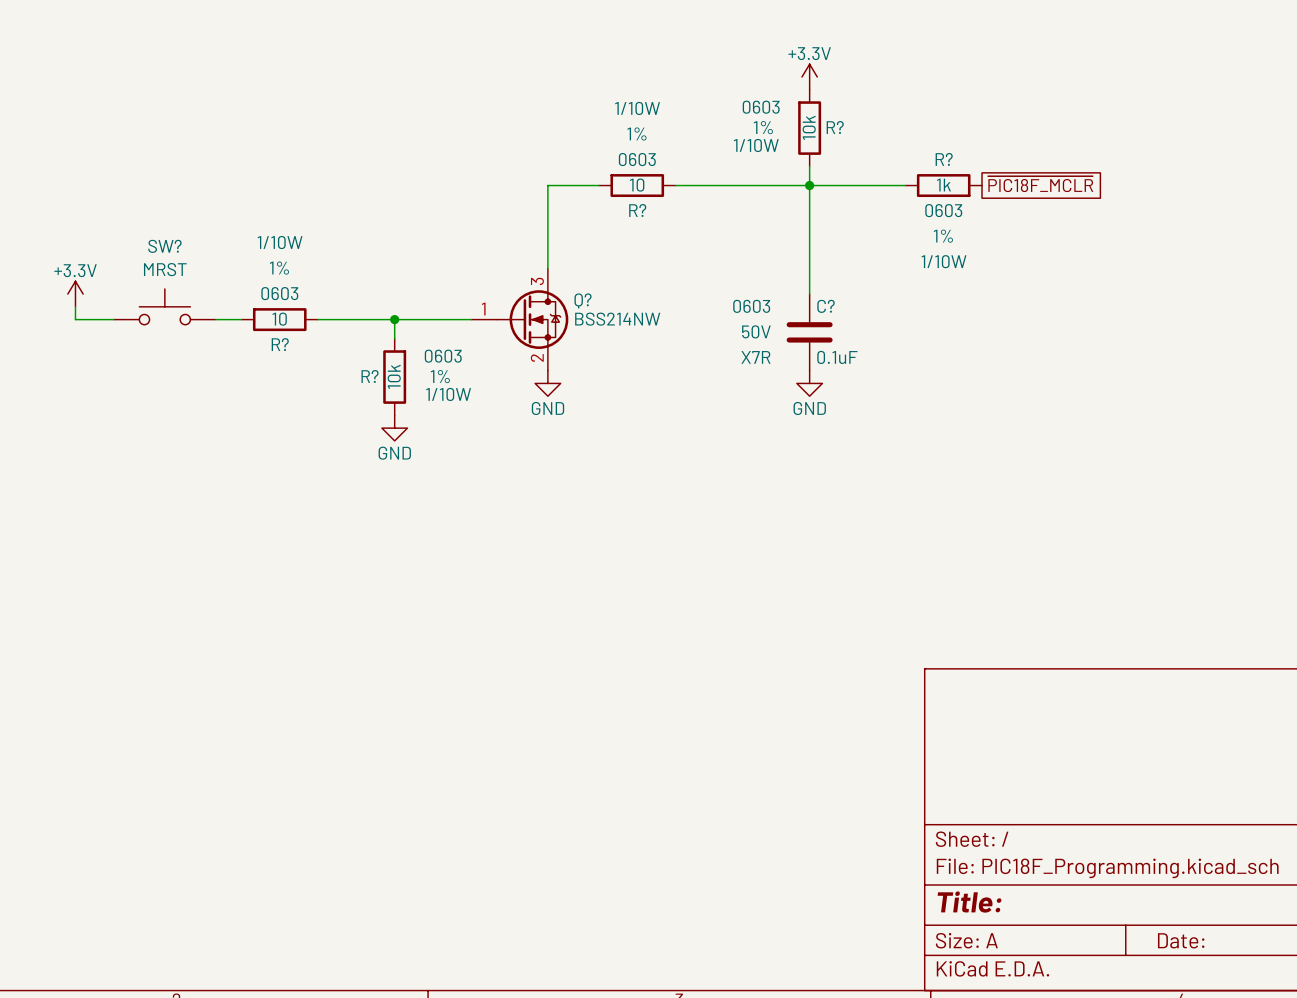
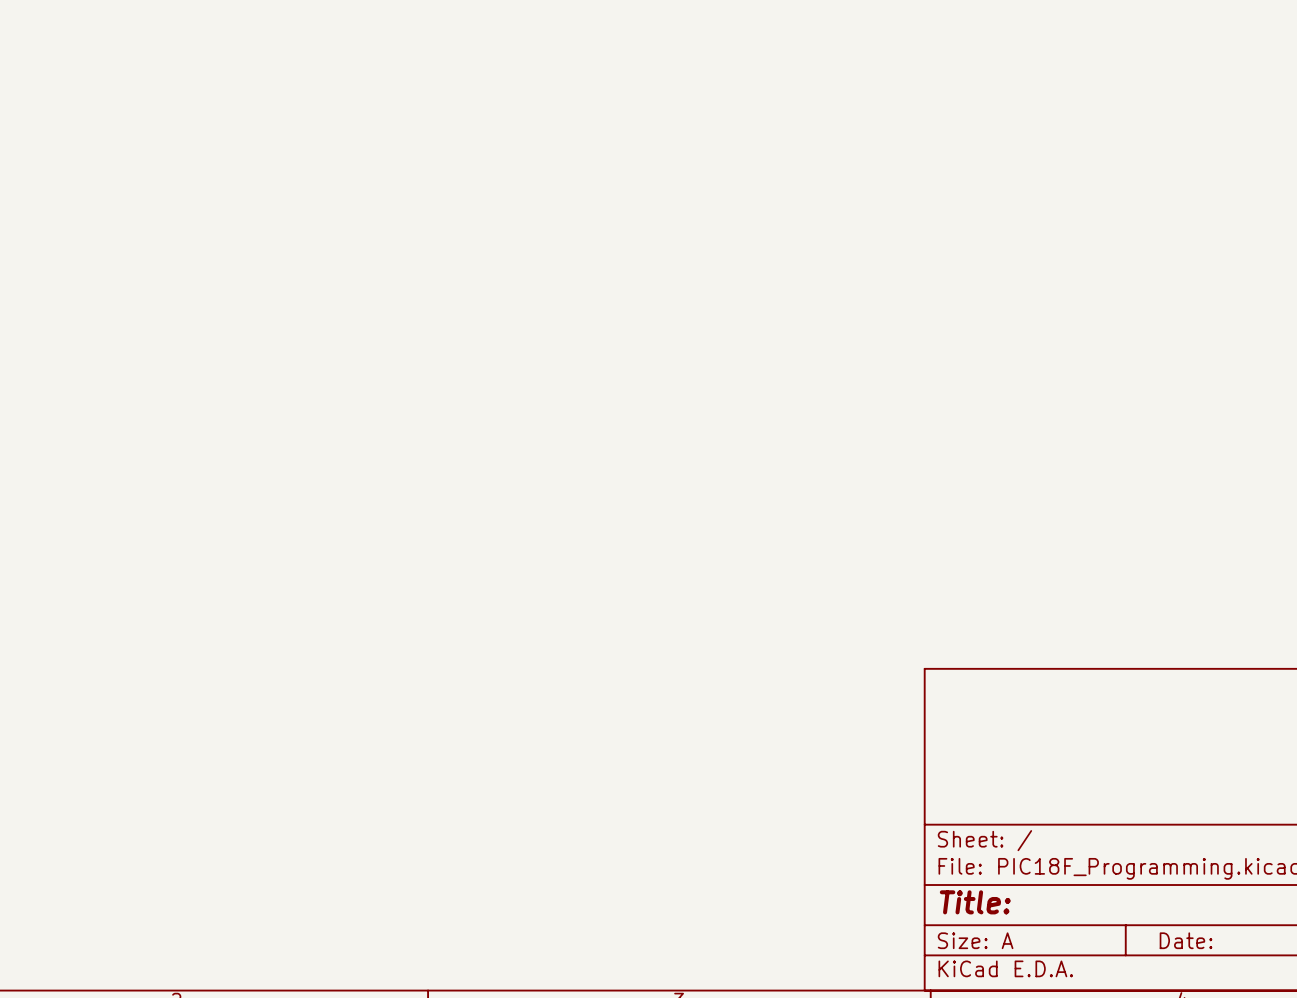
power symbol: +3.3V (809, 77) -> none
R?: 10k (809, 128) -> none
wire: (809, 166) (809, 294) -> none
global label: ~{PIC18F_MCLR} (1040, 184) -> none
wire: (598, 185) (547, 185) (547, 268) -> none
R?: 10 (637, 185) -> none
wire: (675, 185) (905, 185) -> none
junction: (809, 185) -> none
R?: 1k (943, 185) -> none
power symbol: +3.3V (75, 294) -> none
wire: (75, 306) (75, 319) (113, 319) -> none
SW?: MRST (164, 306) -> none
wire: (215, 319) (241, 319) -> none
R?: 10 (279, 319) -> none
wire: (318, 319) (471, 319) -> none
wire: (394, 319) (394, 338) -> none
junction: (394, 319) -> none
Q?: BSS214NW (519, 319) -> none
C?: 0.1uF (809, 332) -> none
R?: 10k (394, 377) -> none
power symbol: GND (547, 383) -> none
power symbol: GND (809, 383) -> none
power symbol: GND (394, 428) -> none

